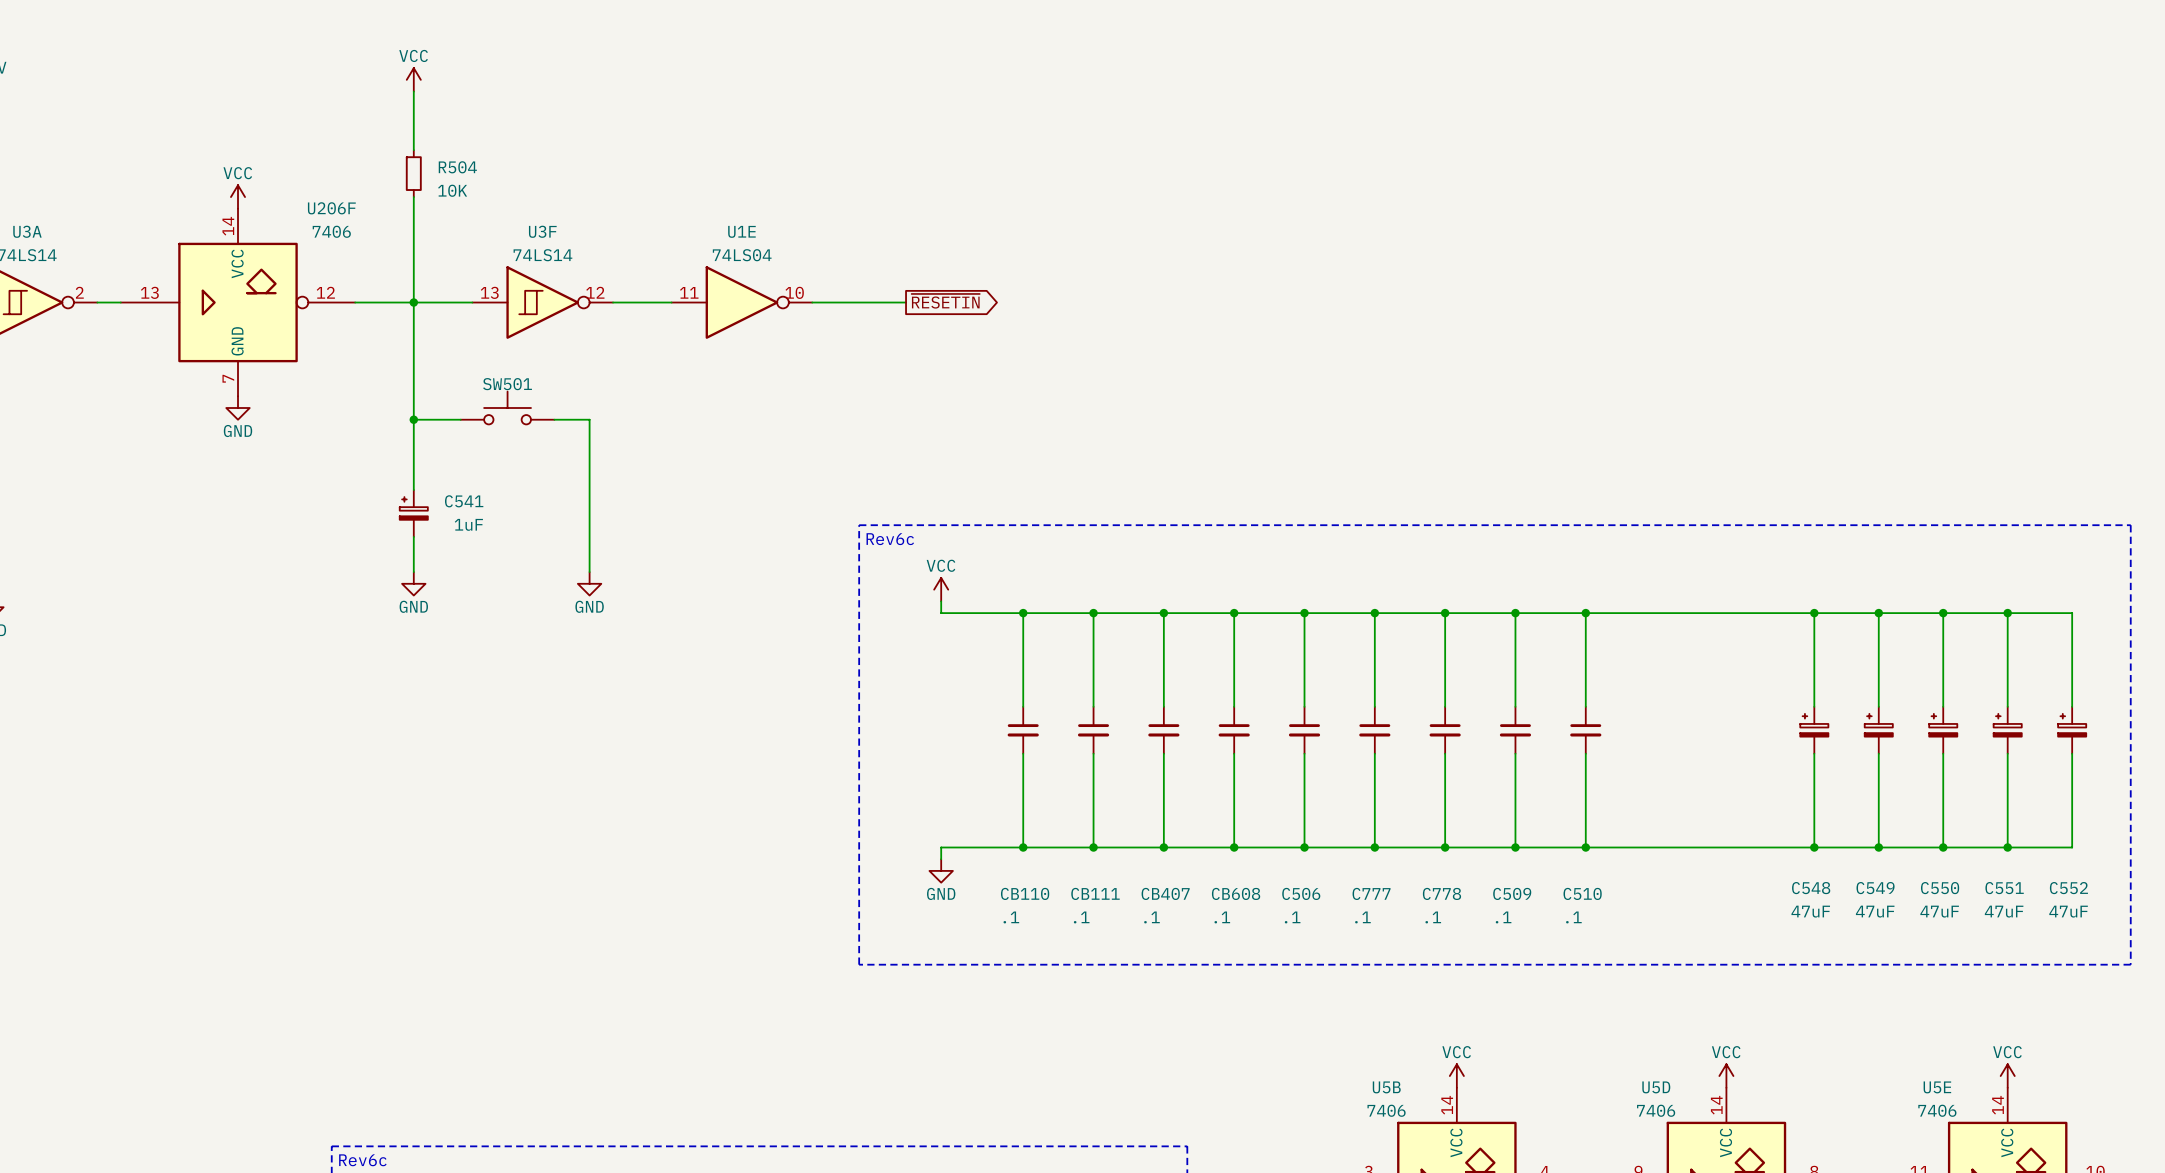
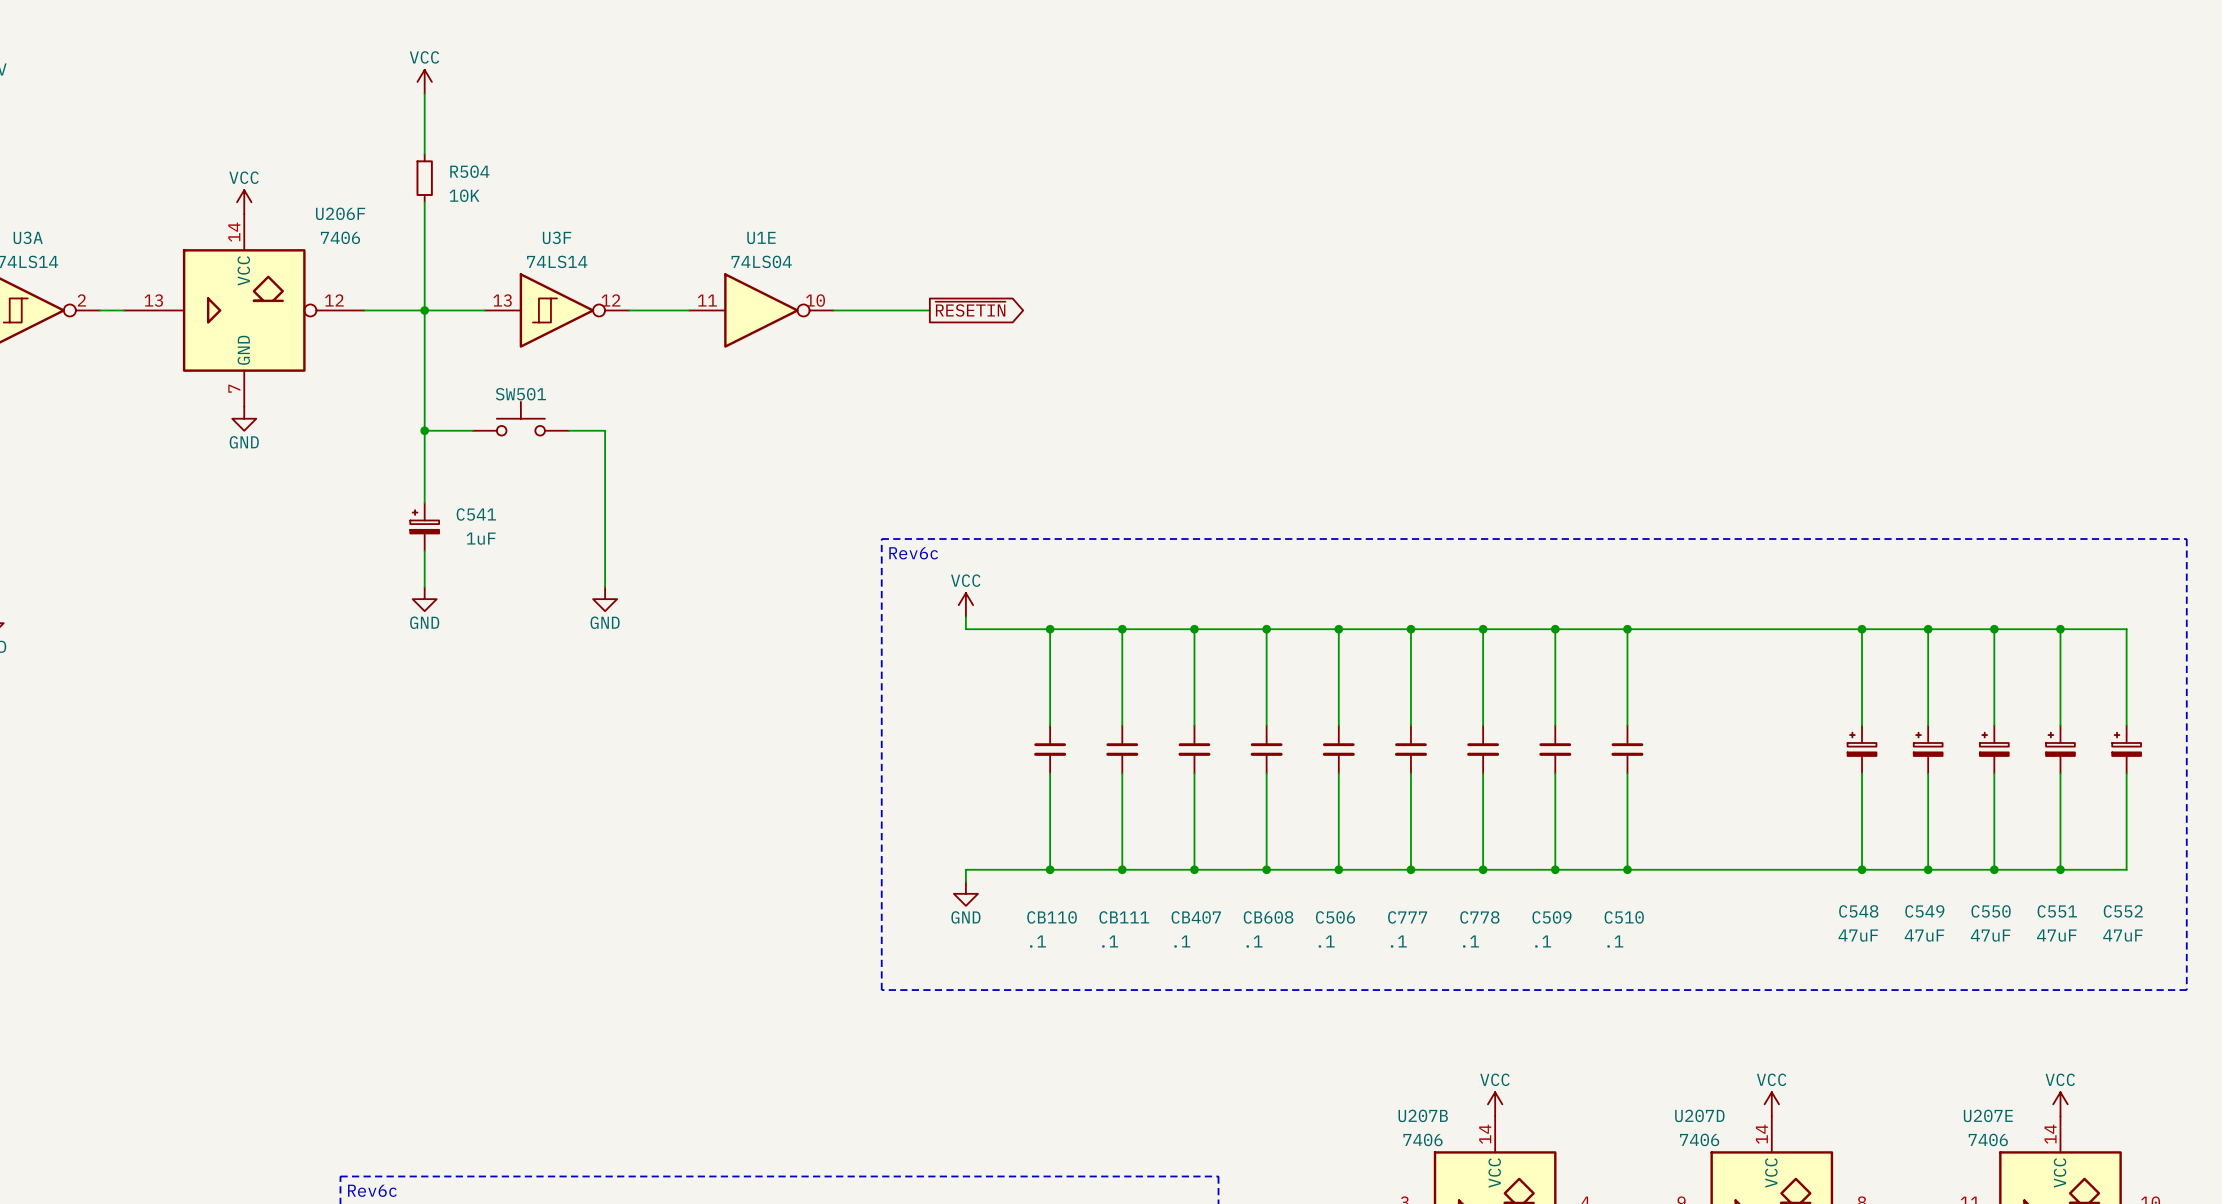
U5B name: U5B (1386, 1087) -> U207B (1423, 1115)
U5D name: U5D (1656, 1087) -> U207D (1699, 1115)
U5E name: U5E (1937, 1087) -> U207E (1988, 1115)

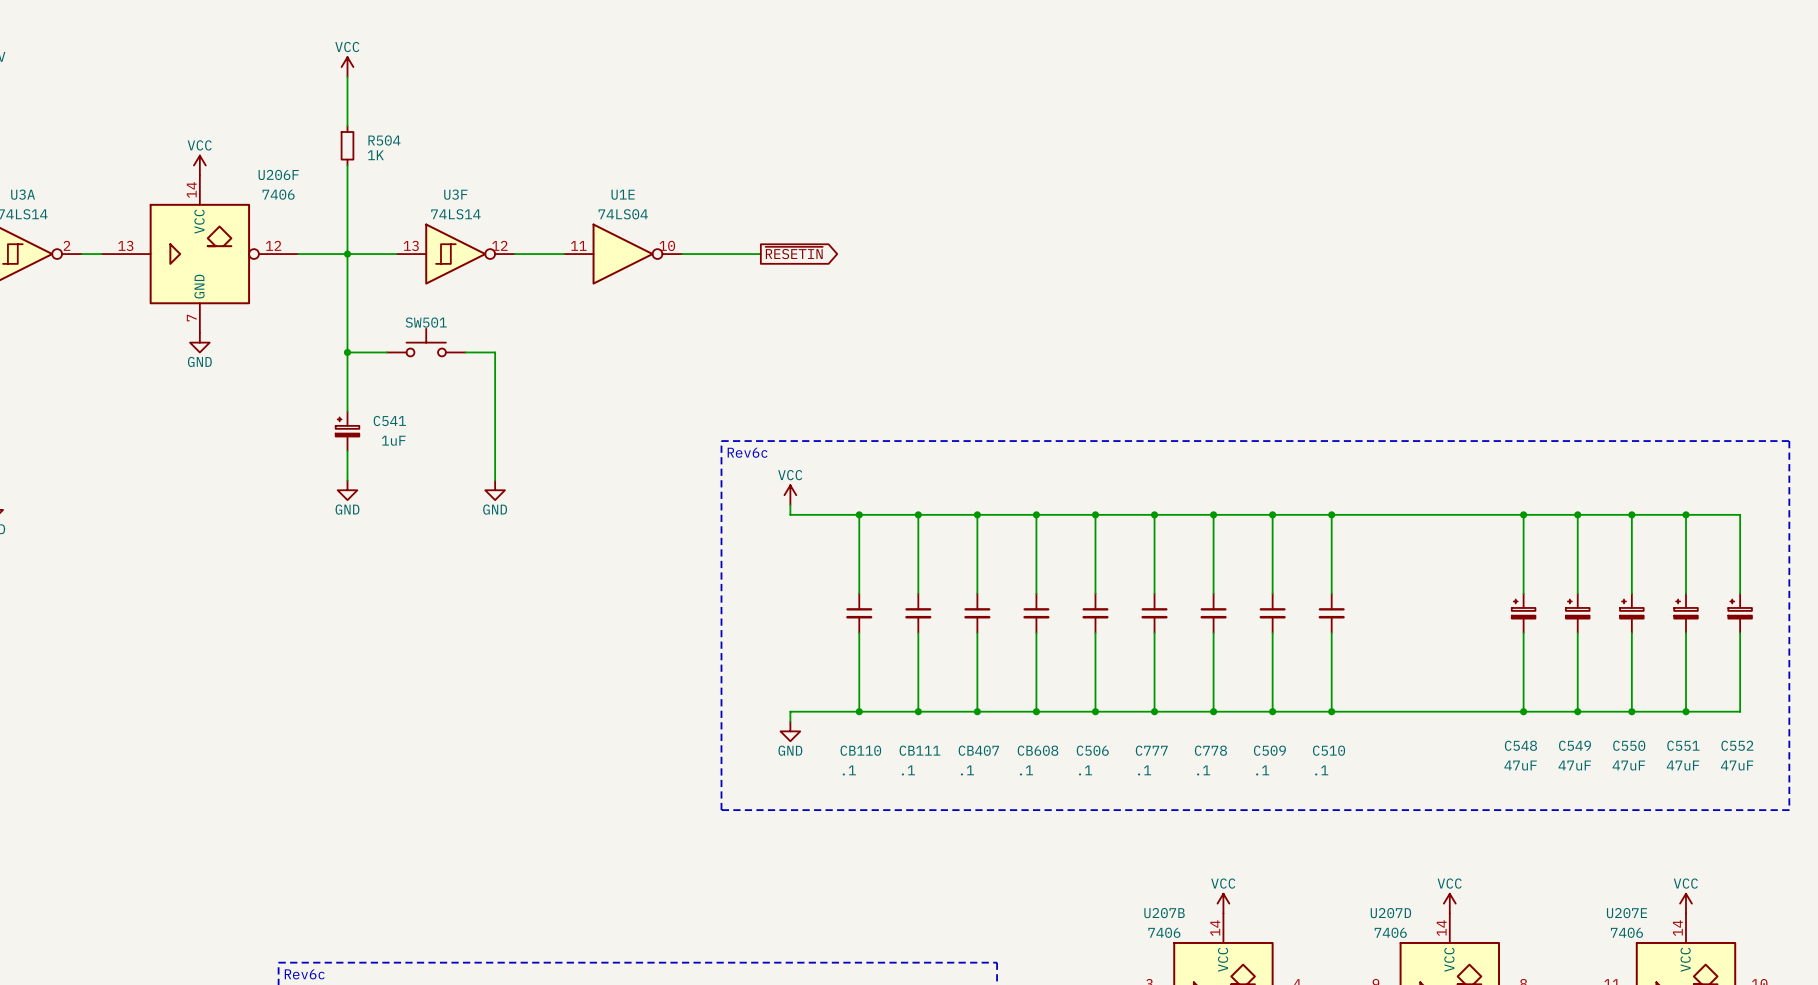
R504 value: 10K (464, 195) -> 1K (375, 155)

